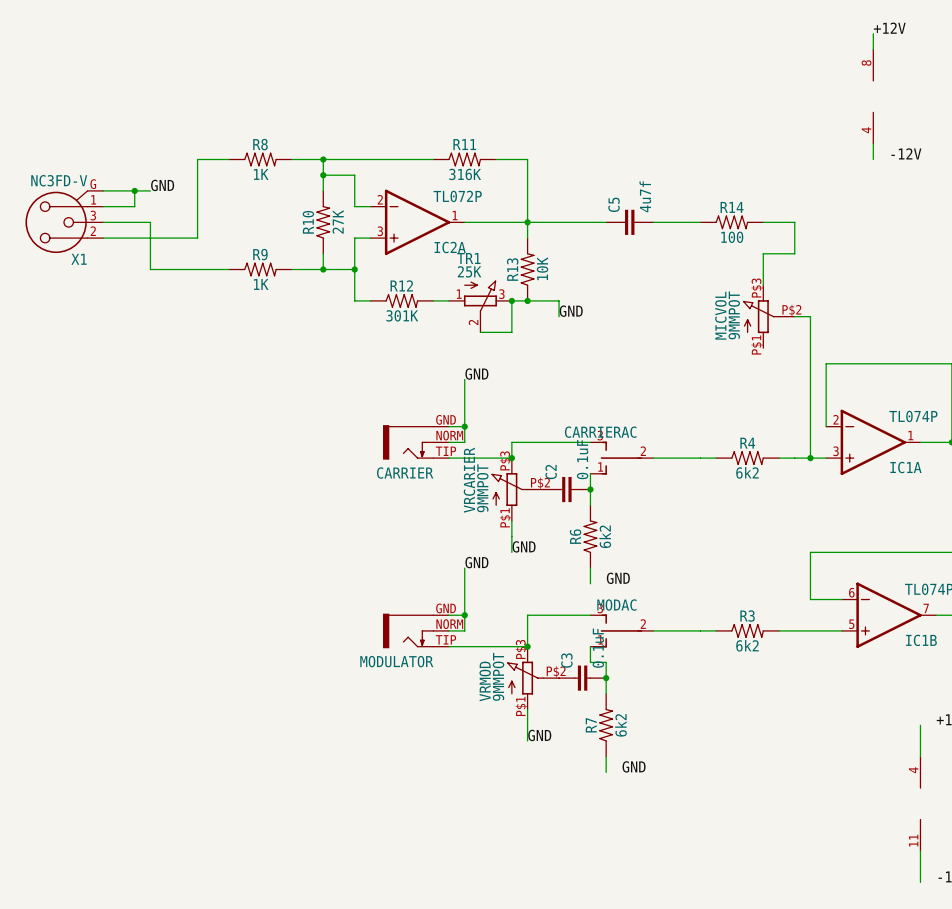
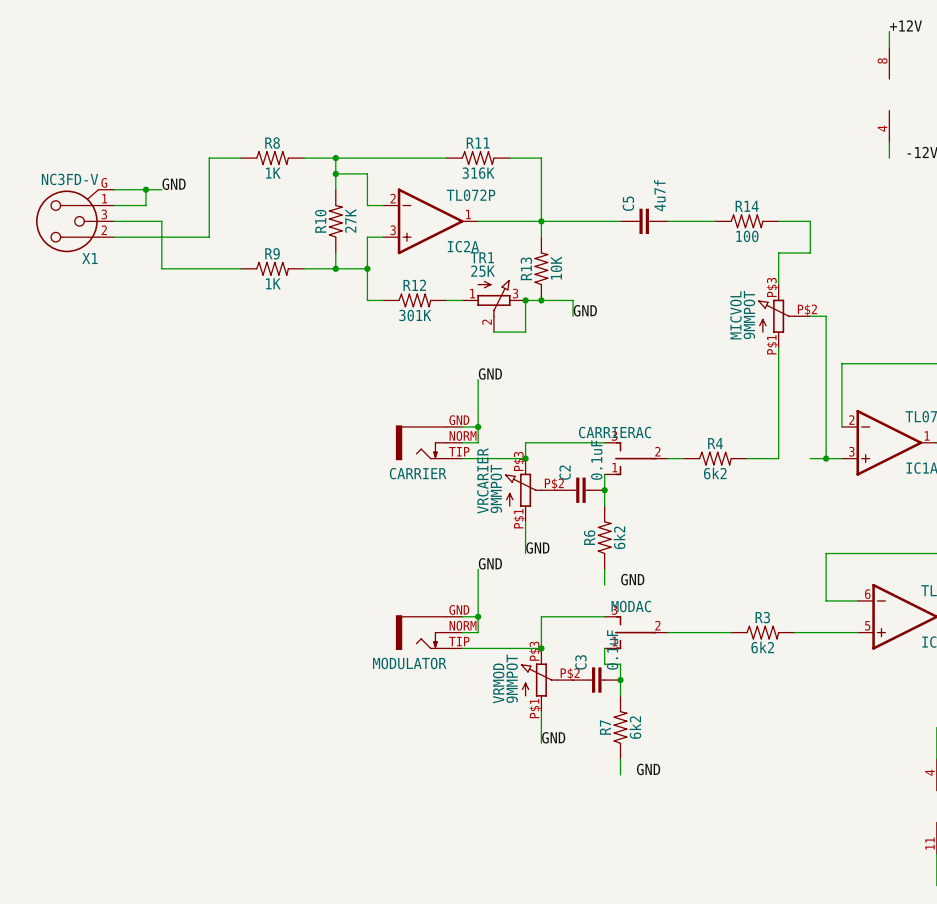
wire: none -> (778, 347) (778, 458) (747, 458)
R4 position: (747, 458) -> (715, 458)
wire: (779, 458) (794, 458) -> none

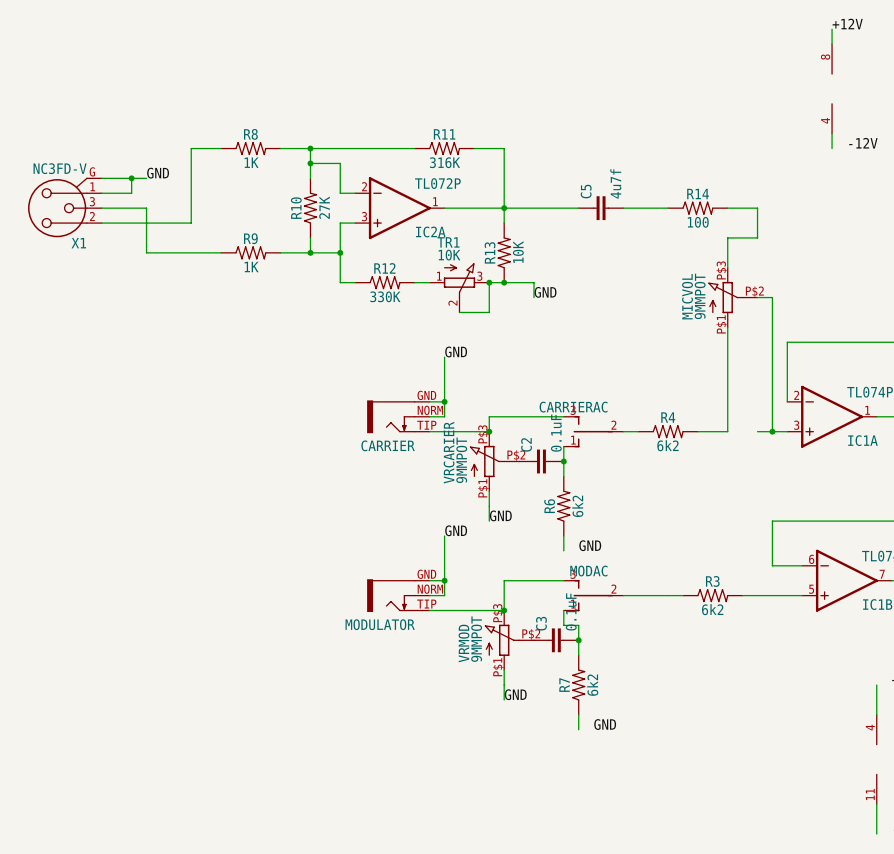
TR1 value: 25K (483, 271) -> 10K (449, 255)
R12 value: 301K (415, 315) -> 330K (385, 296)

